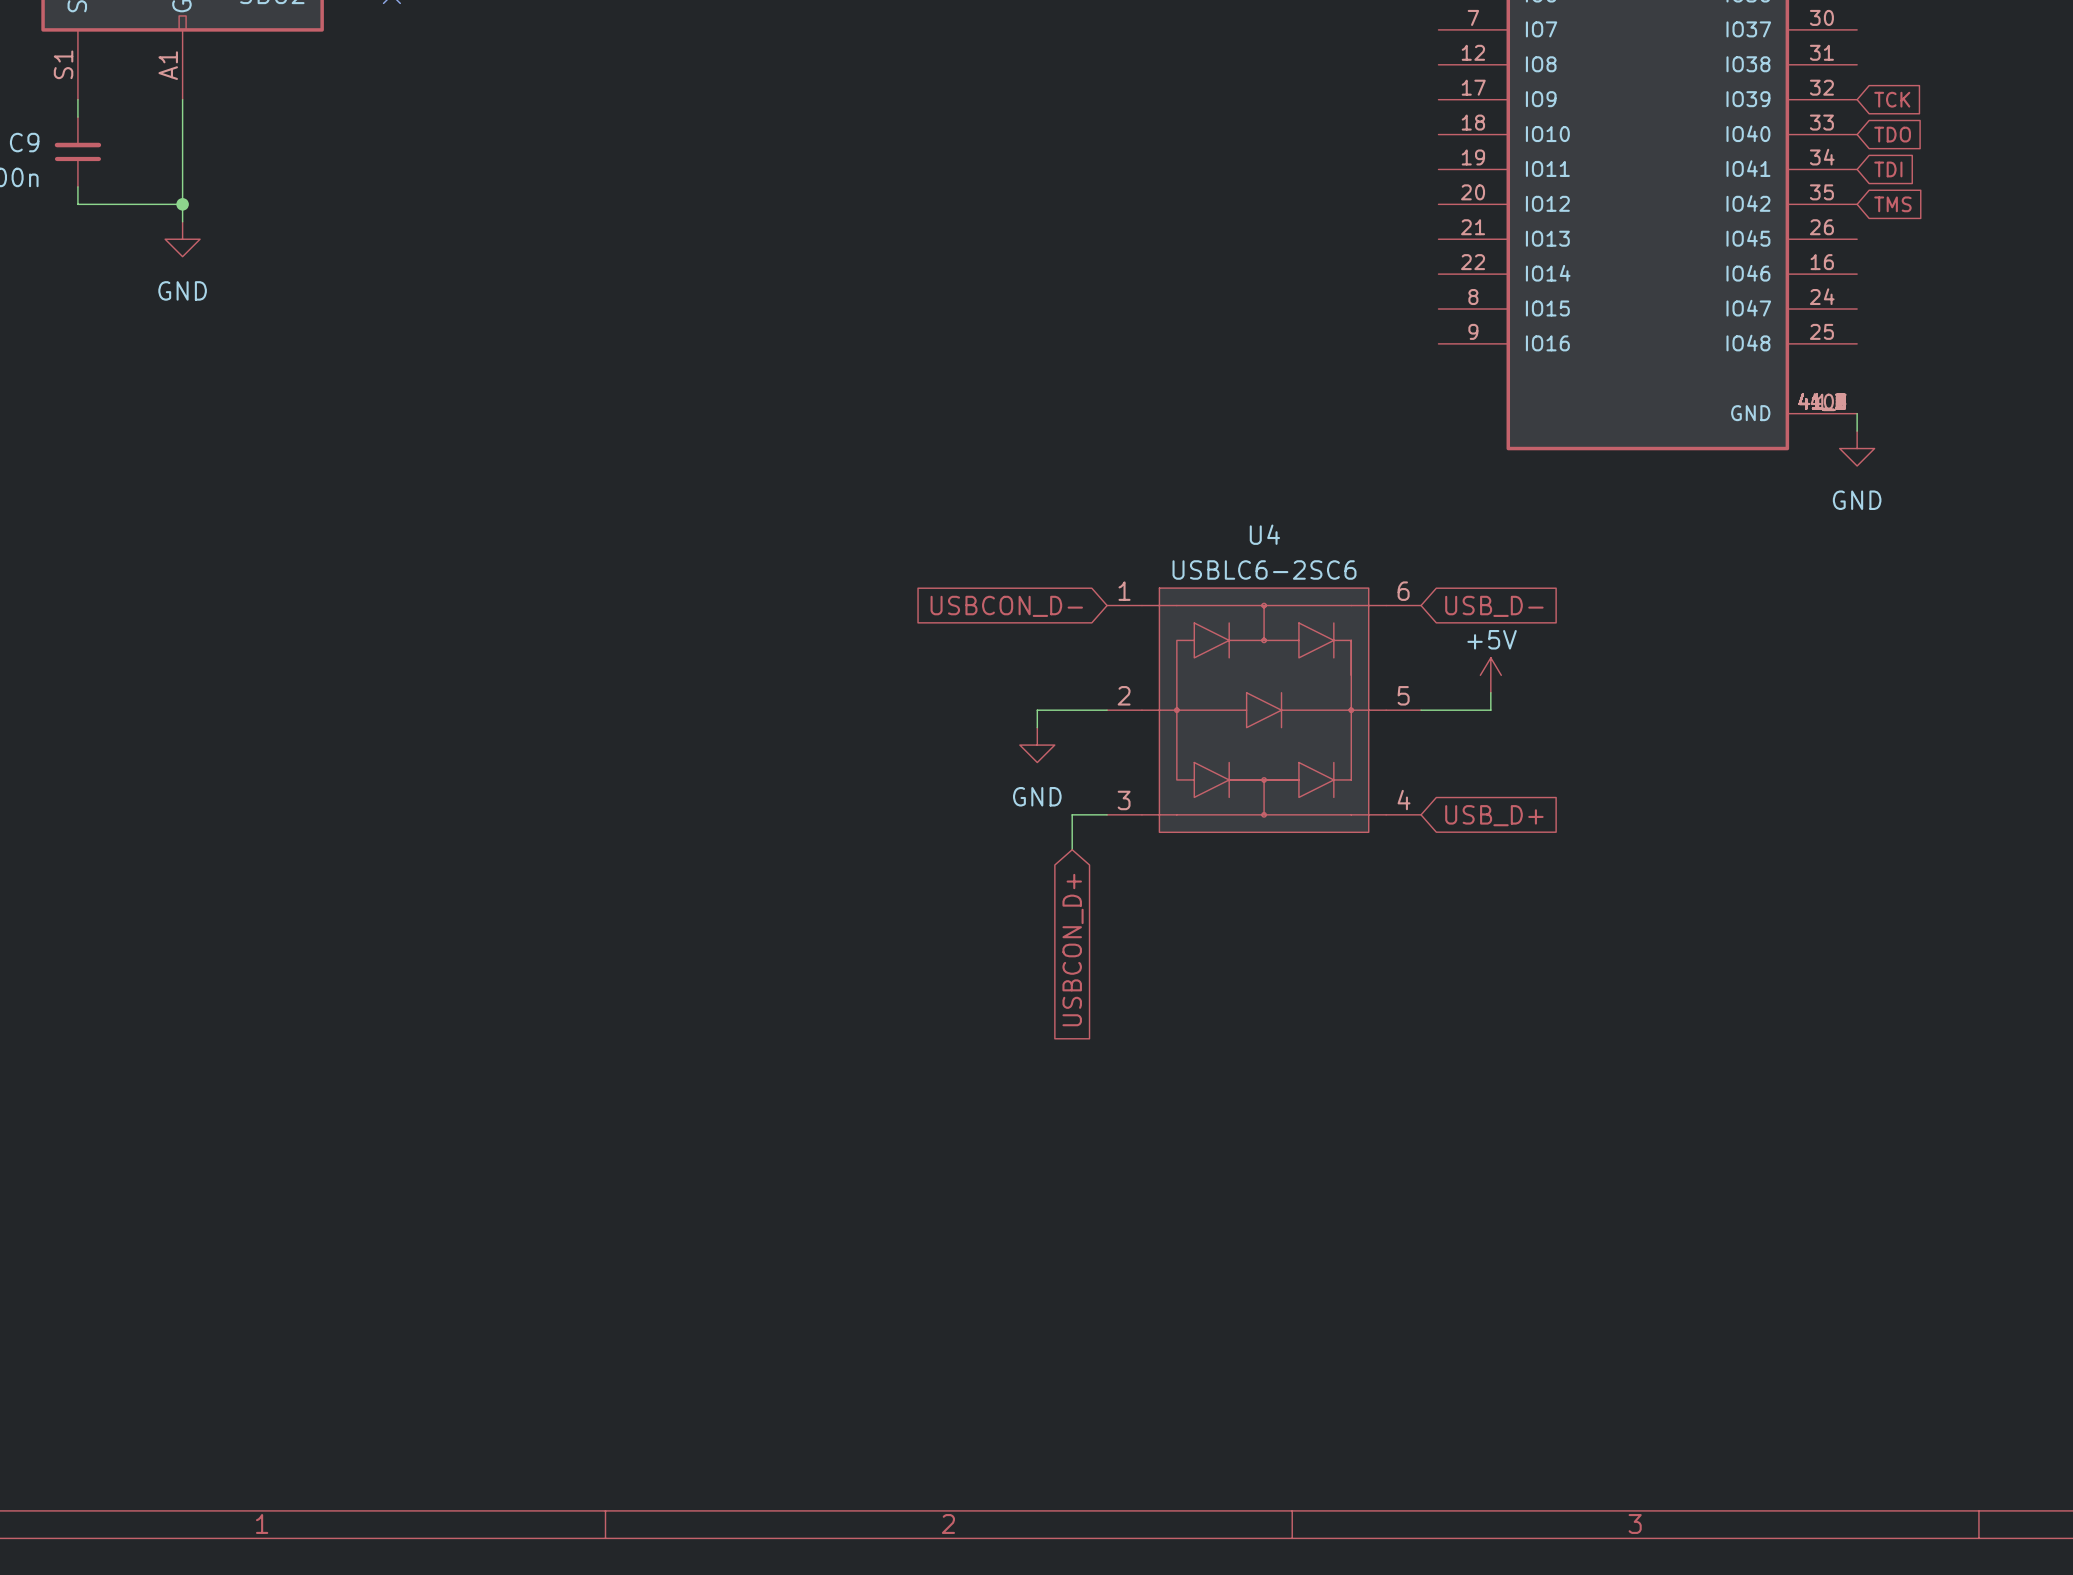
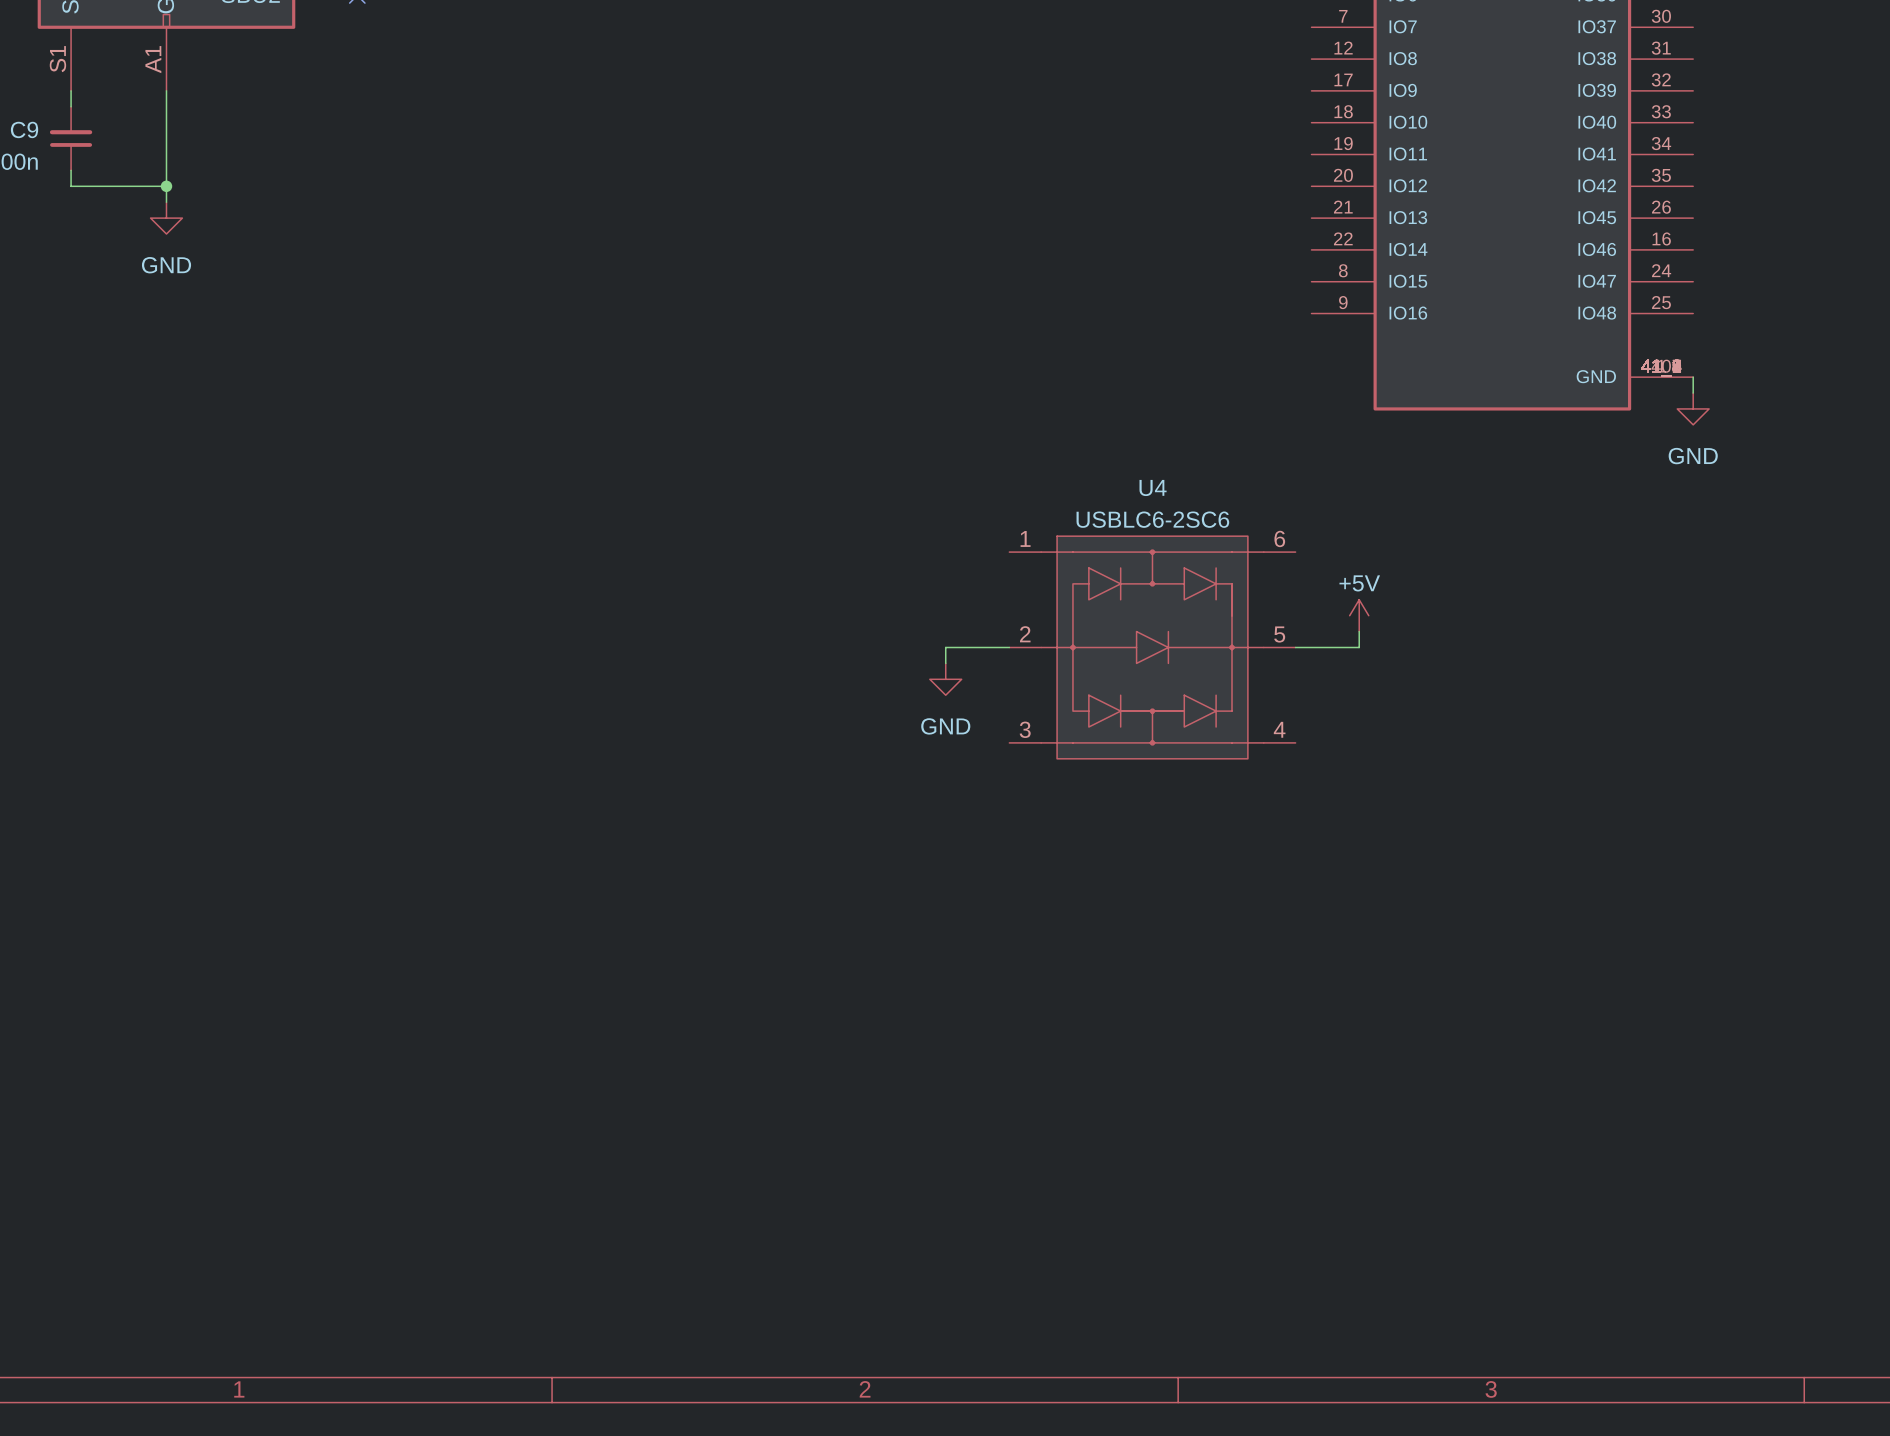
global label: TCK (1892, 99) -> none
global label: TDO (1892, 134) -> none
global label: TDI (1888, 169) -> none
global label: TMS (1892, 204) -> none
global label: USBCON_D- (1006, 606) -> none
global label: USB_D- (1494, 606) -> none
wire: (1107, 814) (1072, 814) (1072, 849) -> none
global label: USB_D+ (1494, 815) -> none
global label: USBCON_D+ (1073, 950) -> none

